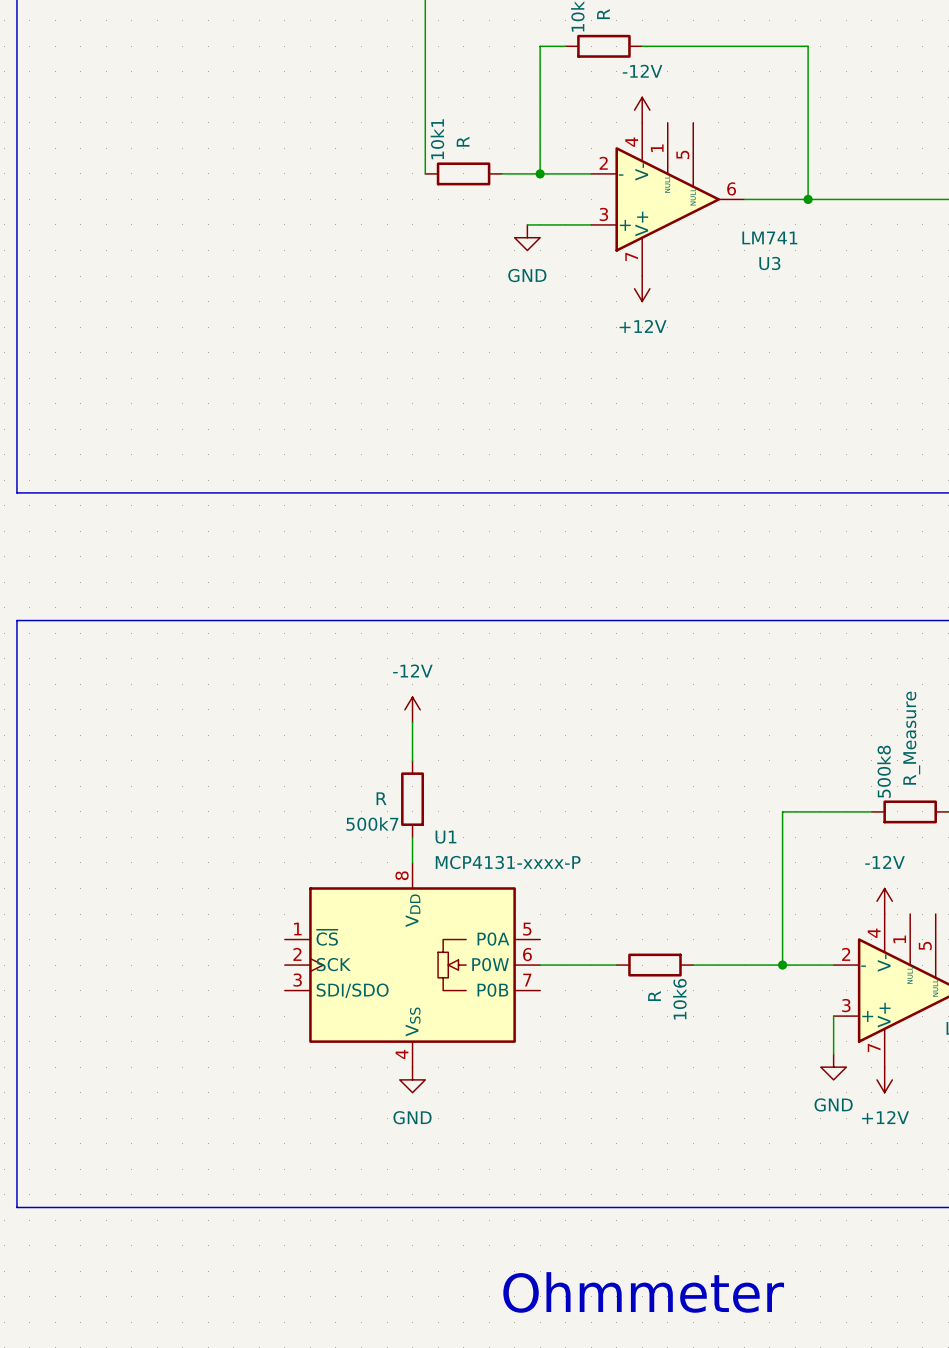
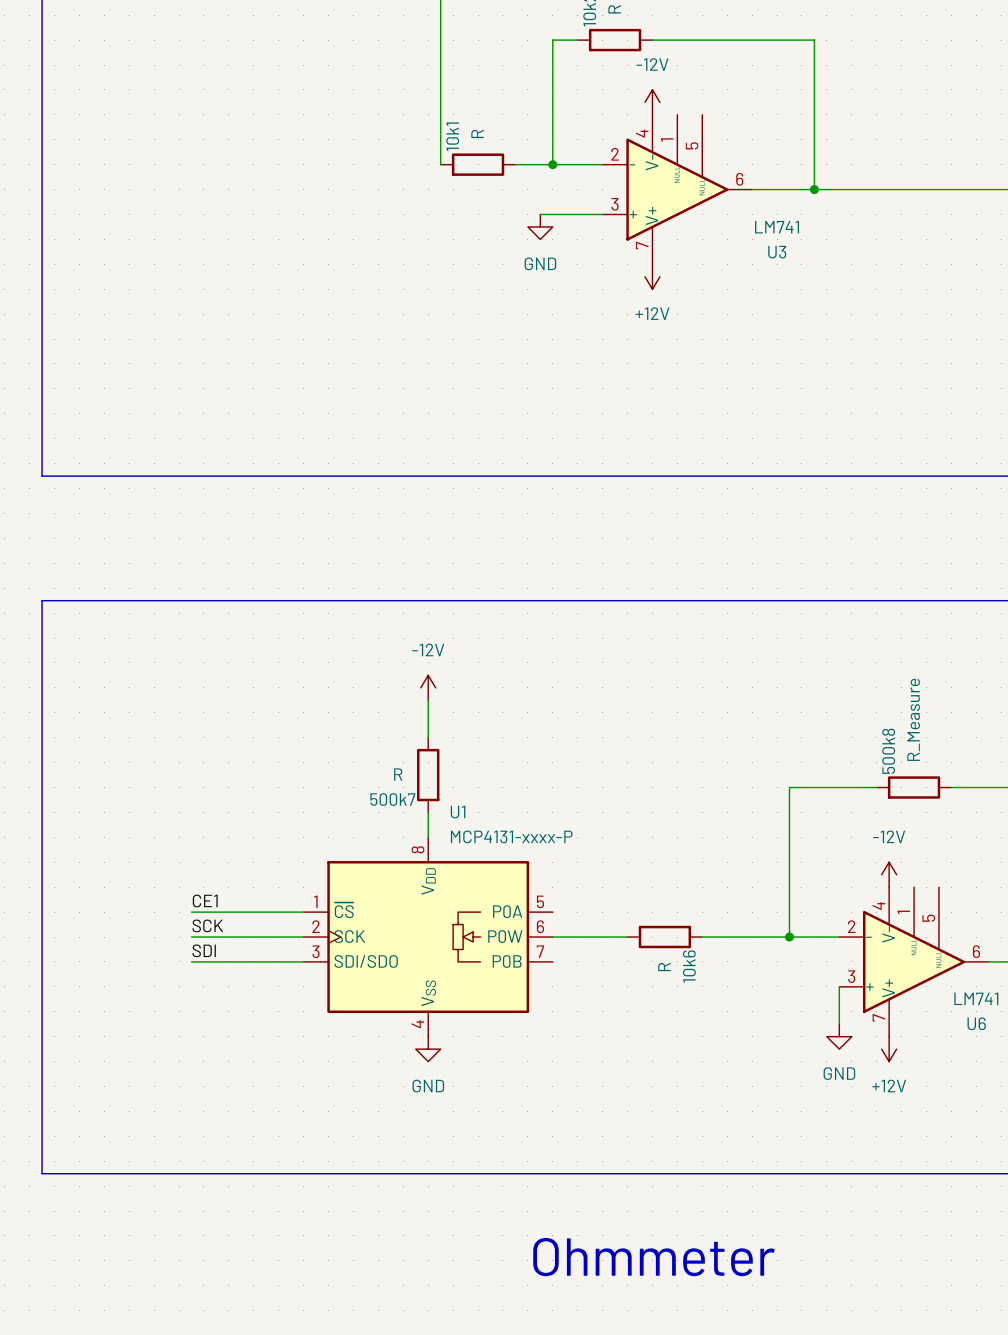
label: none -> CE1 (205, 901)
wire: none -> (191, 912) (303, 912)
label: none -> SCK (207, 925)
wire: none -> (191, 937) (303, 937)
label: none -> SDI (204, 950)
wire: none -> (191, 961) (303, 961)

